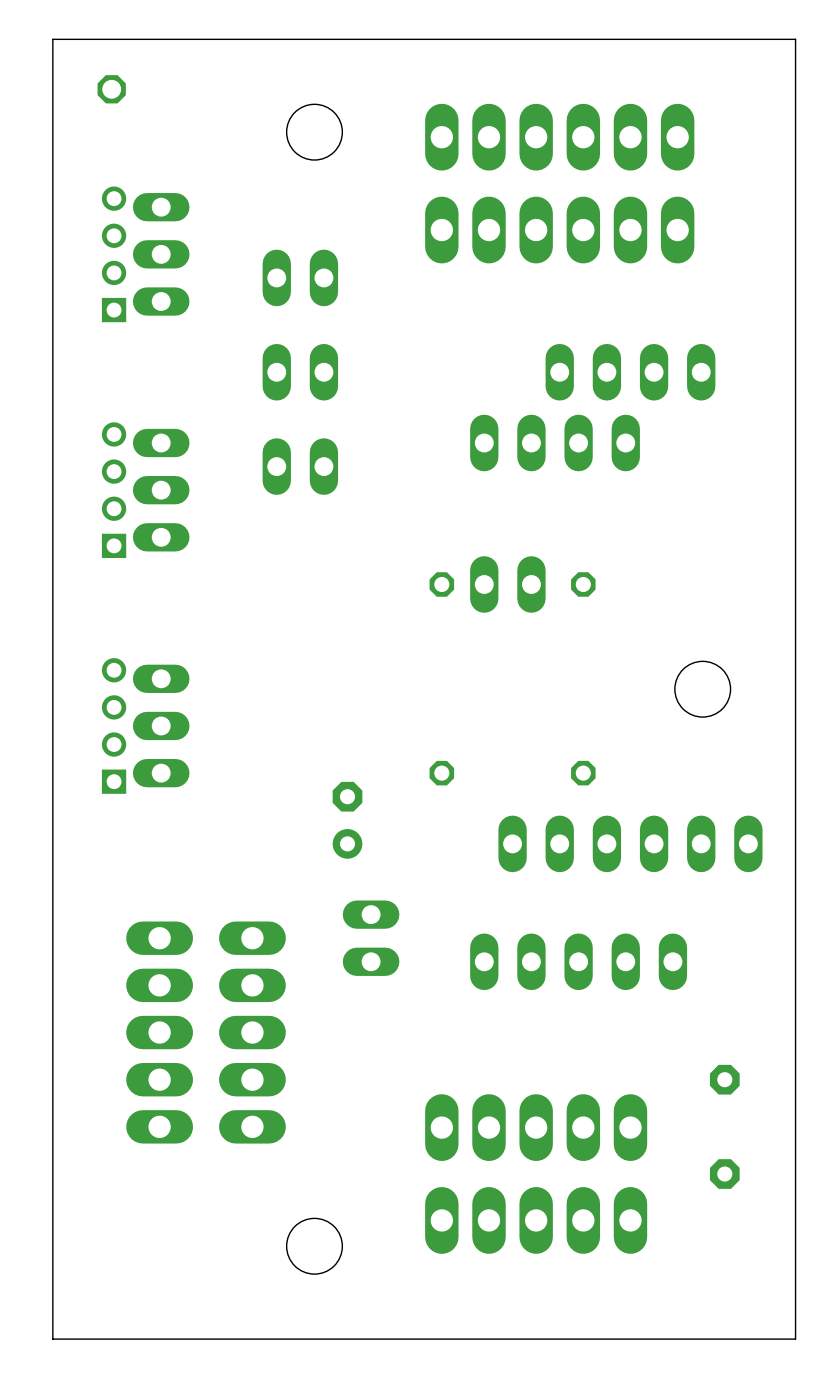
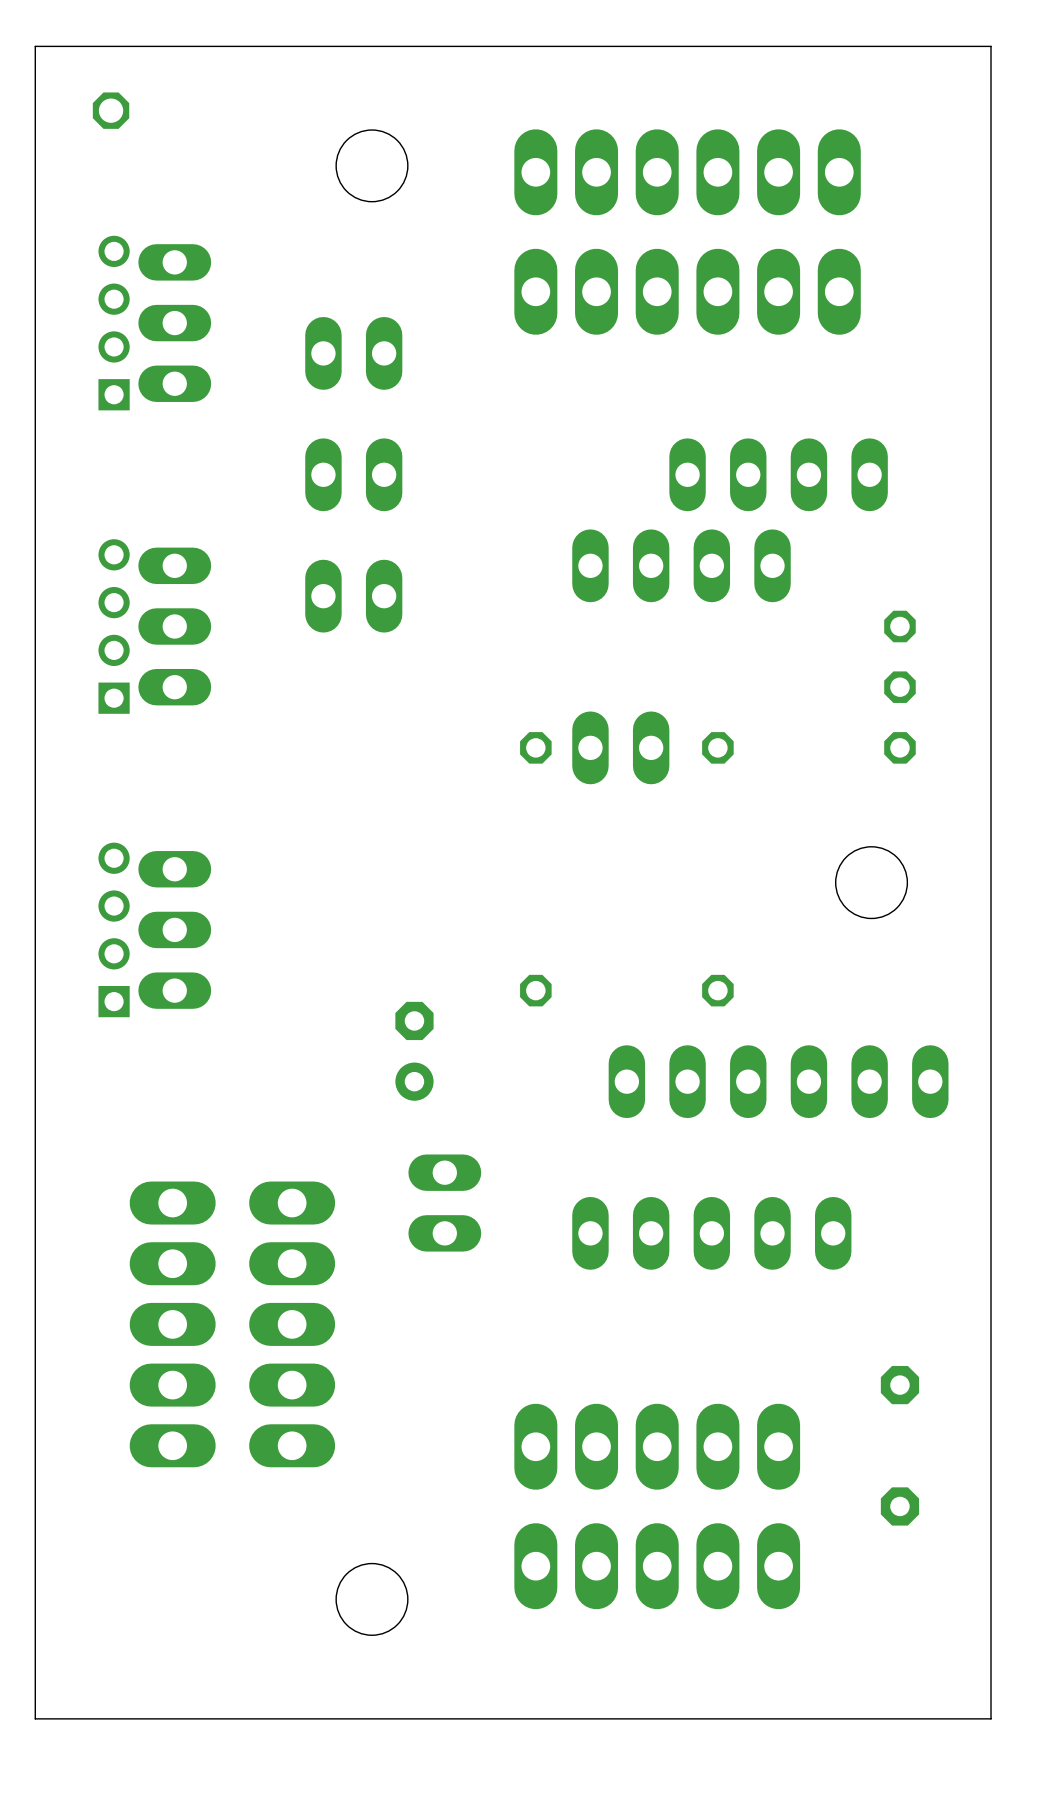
part: none -> (899, 687)

